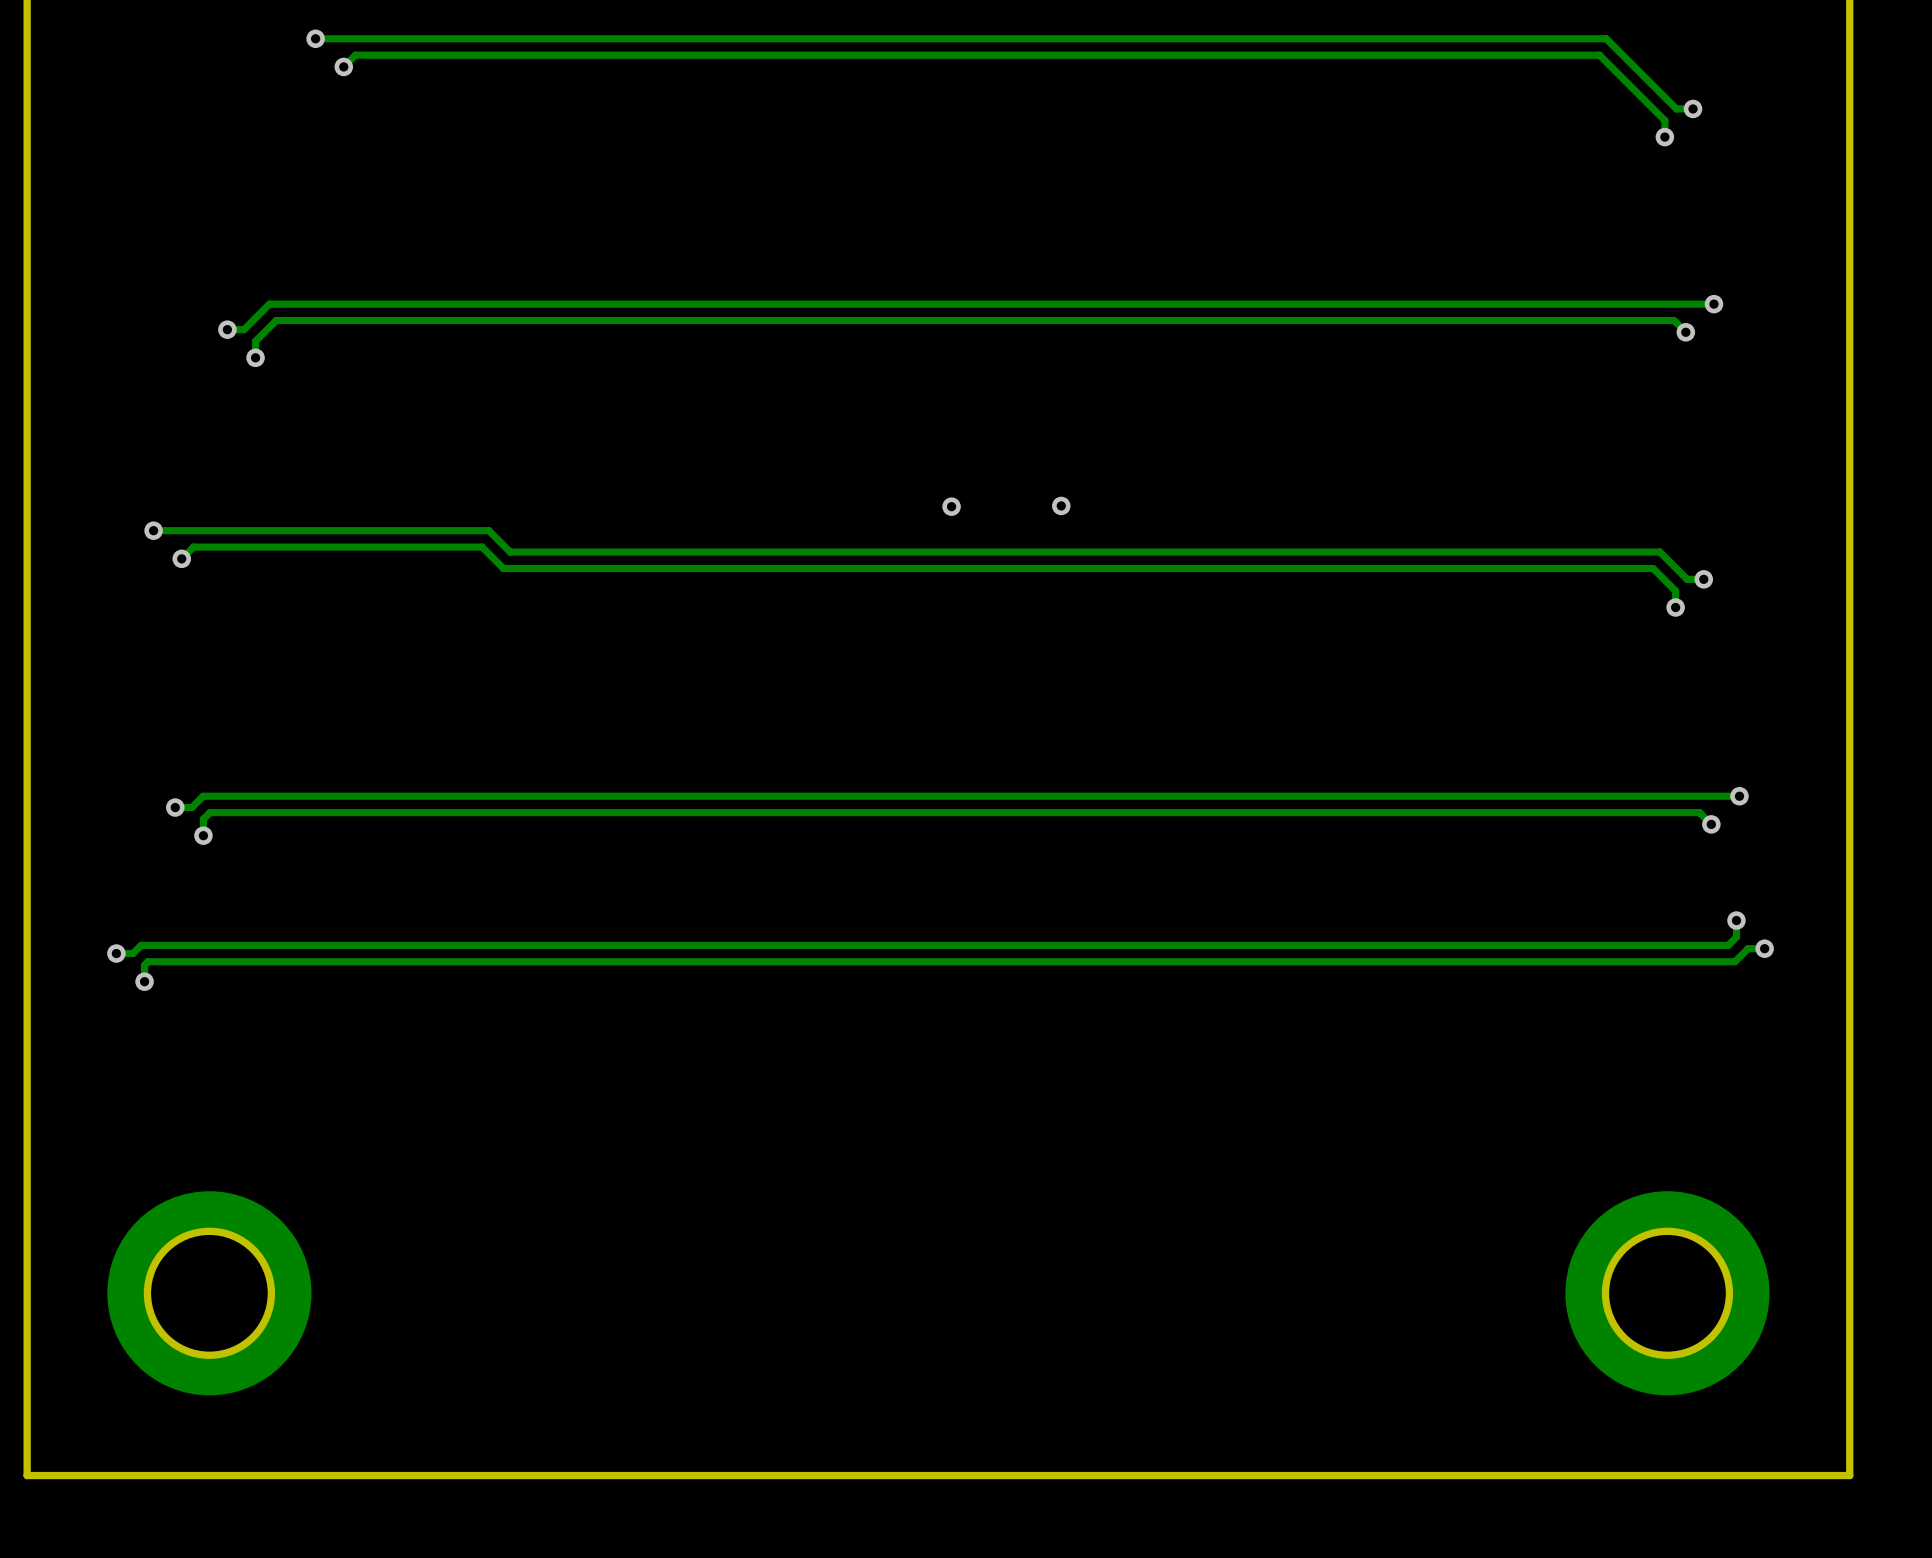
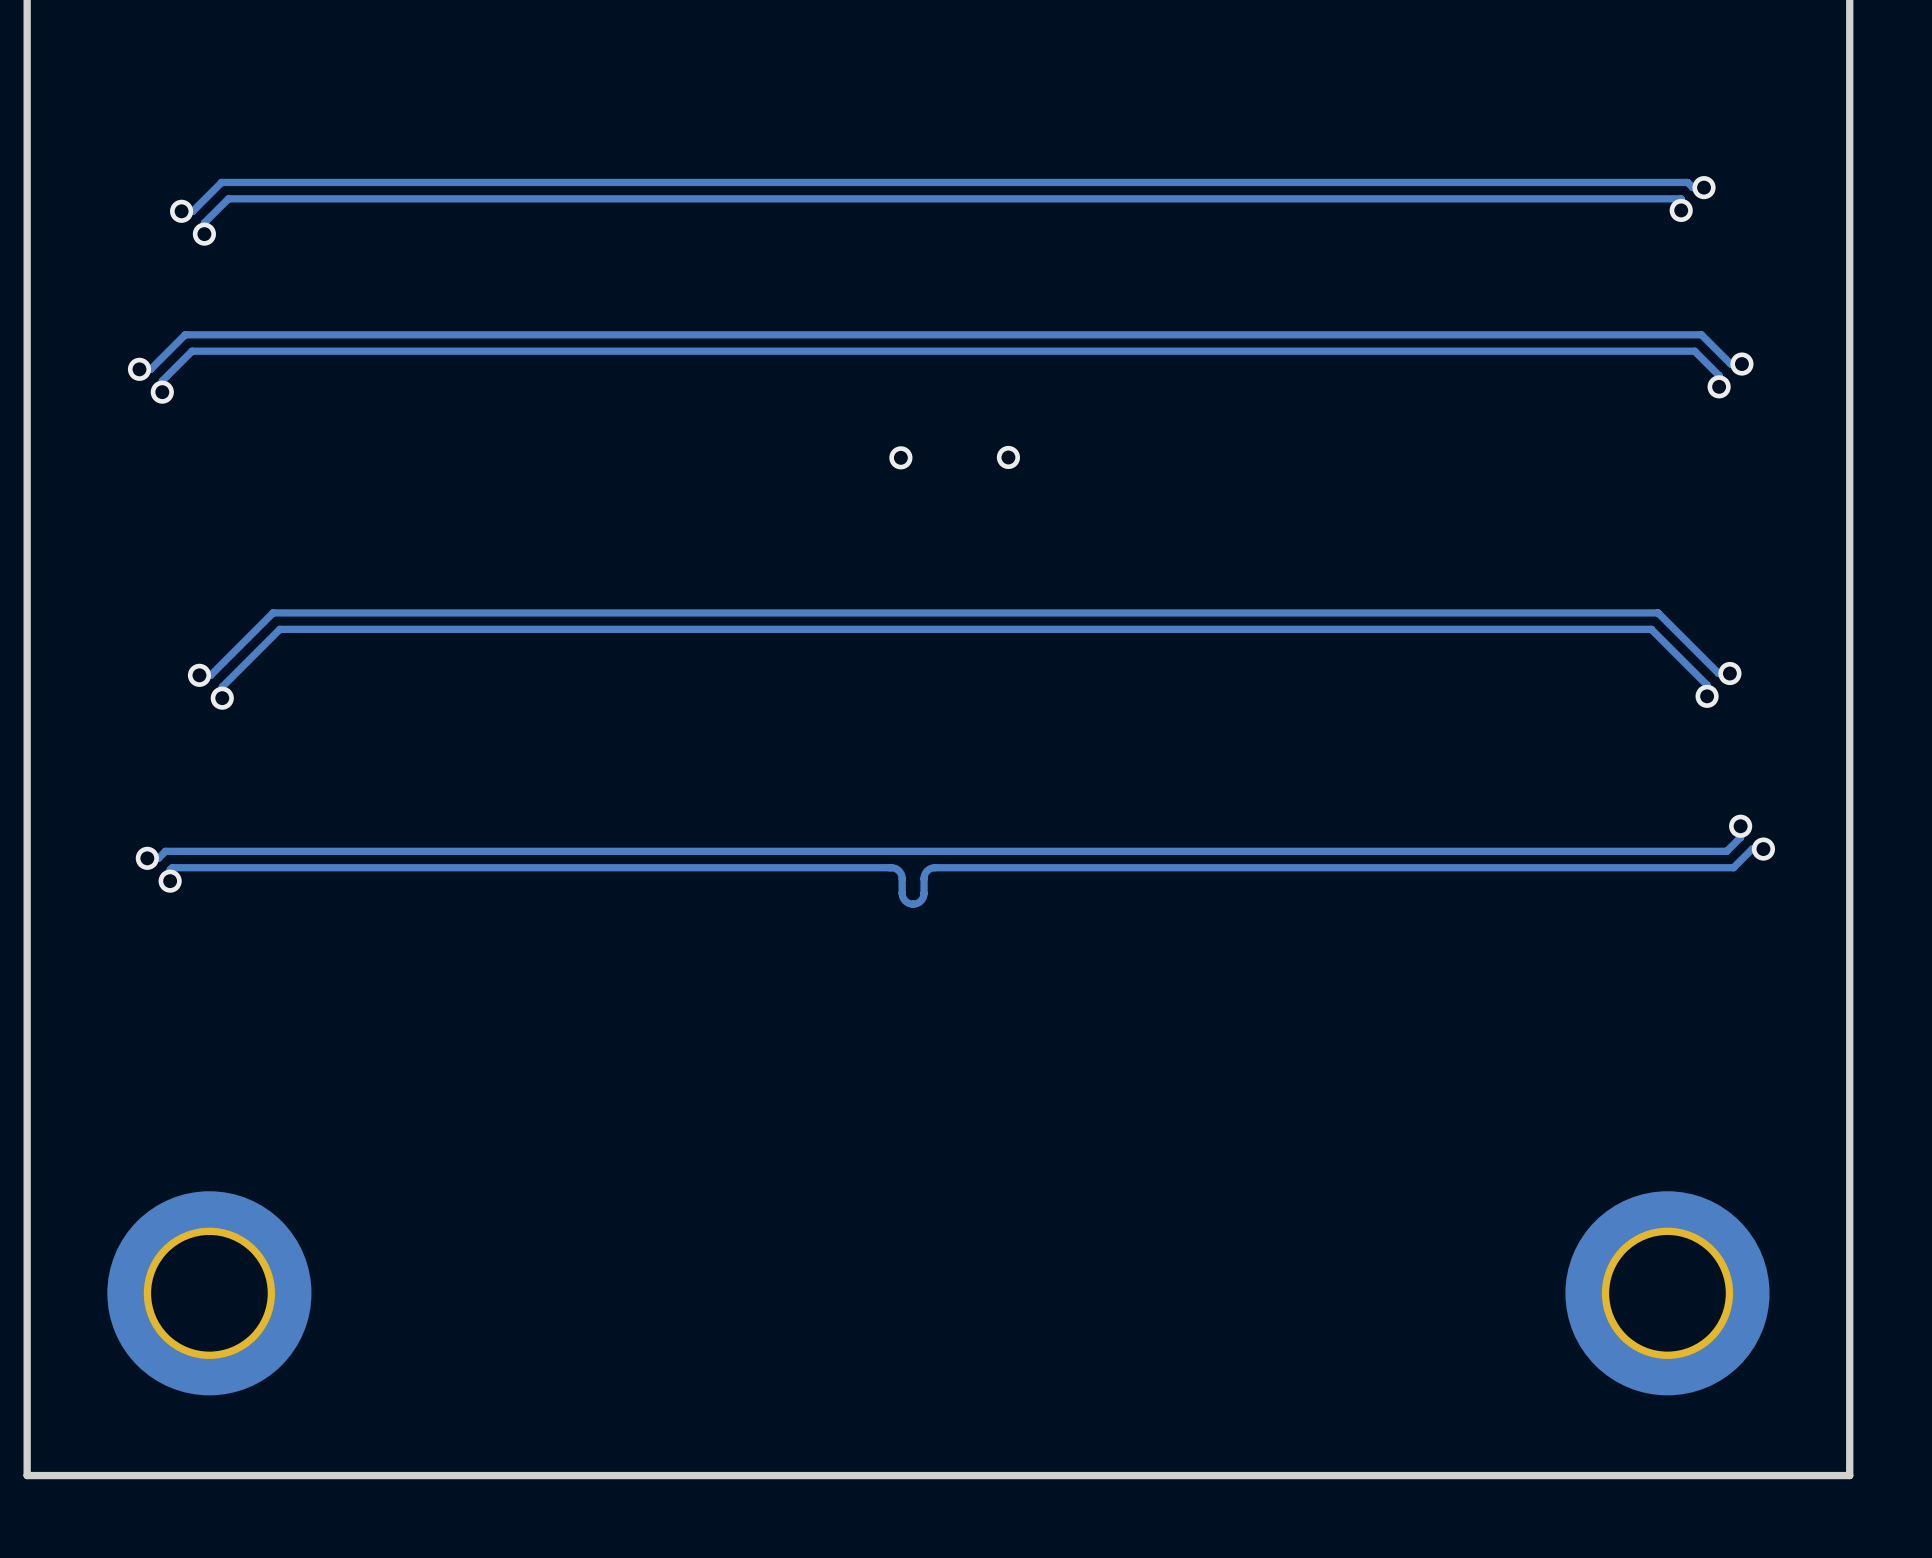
track: (315, 38) (1606, 38) (1676, 108) (1693, 108) -> none
via: (315, 38) -> none
track: (343, 66) (355, 55) (1599, 55) (1664, 120) (1664, 137) -> none
via: (343, 66) -> none
via: (1693, 108) -> none
via: (1664, 137) -> none
track: none -> (1704, 187) (1692, 187) (1687, 182) (221, 182) (192, 211) (181, 211)
via: none -> (1704, 187)
track: none -> (1680, 198) (228, 198) (204, 222) (204, 234)
via: none -> (1681, 210)
via: none -> (181, 211)
via: none -> (204, 234)
track: (1713, 304) (269, 304) (243, 329) (227, 329) -> none
via: (1713, 304) -> none
via: (227, 329) -> none
track: (1685, 332) (1674, 320) (276, 320) (255, 341) (255, 357) -> none
via: (1685, 332) -> none
via: (255, 357) -> none
track: none -> (1741, 364) (1730, 364) (1701, 334) (185, 334) (150, 369) (139, 369)
via: none -> (1741, 364)
via: none -> (139, 369)
track: none -> (1719, 386) (1719, 375) (1694, 351) (192, 351) (162, 380) (162, 392)
via: none -> (1719, 386)
via: none -> (162, 392)
via: none -> (900, 457)
via: none -> (1008, 457)
via: (1061, 505) -> none
via: (951, 506) -> none
track: (153, 530) (488, 530) (510, 552) (1659, 552) (1687, 579) (1703, 579) -> none
via: (153, 530) -> none
track: (181, 558) (193, 547) (482, 547) (503, 568) (1653, 568) (1675, 590) (1675, 607) -> none
via: (181, 558) -> none
via: (1703, 579) -> none
via: (1675, 607) -> none
track: none -> (1729, 673) (1718, 673) (1658, 612) (273, 612) (210, 675) (199, 675)
via: none -> (1729, 673)
via: none -> (199, 675)
track: none -> (1707, 696) (1707, 685) (1651, 629) (279, 629) (222, 686) (222, 698)
via: none -> (1707, 696)
via: none -> (222, 698)
track: (1739, 796) (203, 796) (191, 807) (175, 807) -> none
via: (1739, 796) -> none
via: (175, 807) -> none
track: (1711, 824) (1699, 812) (209, 812) (203, 819) (203, 835) -> none
via: (1711, 824) -> none
track: none -> (1740, 826) (1740, 837) (1726, 851) (165, 851) (158, 858) (147, 858)
via: none -> (1740, 826)
via: (203, 835) -> none
track: none -> (1763, 849) (1752, 849) (1733, 867) (934, 867) (929, 869) (924, 874) (922, 898) (913, 904) (903, 898) (901, 874) (896, 869) (891, 867) (172, 867) (170, 869) (170, 881)
via: none -> (1763, 849)
via: none -> (147, 858)
via: none -> (170, 881)
track: (1736, 920) (1736, 937) (1728, 945) (141, 945) (132, 953) (116, 953) -> none
via: (1736, 920) -> none
track: (1764, 948) (1748, 948) (1735, 961) (147, 961) (144, 965) (144, 981) -> none
via: (1764, 948) -> none
via: (116, 953) -> none
via: (144, 981) -> none

